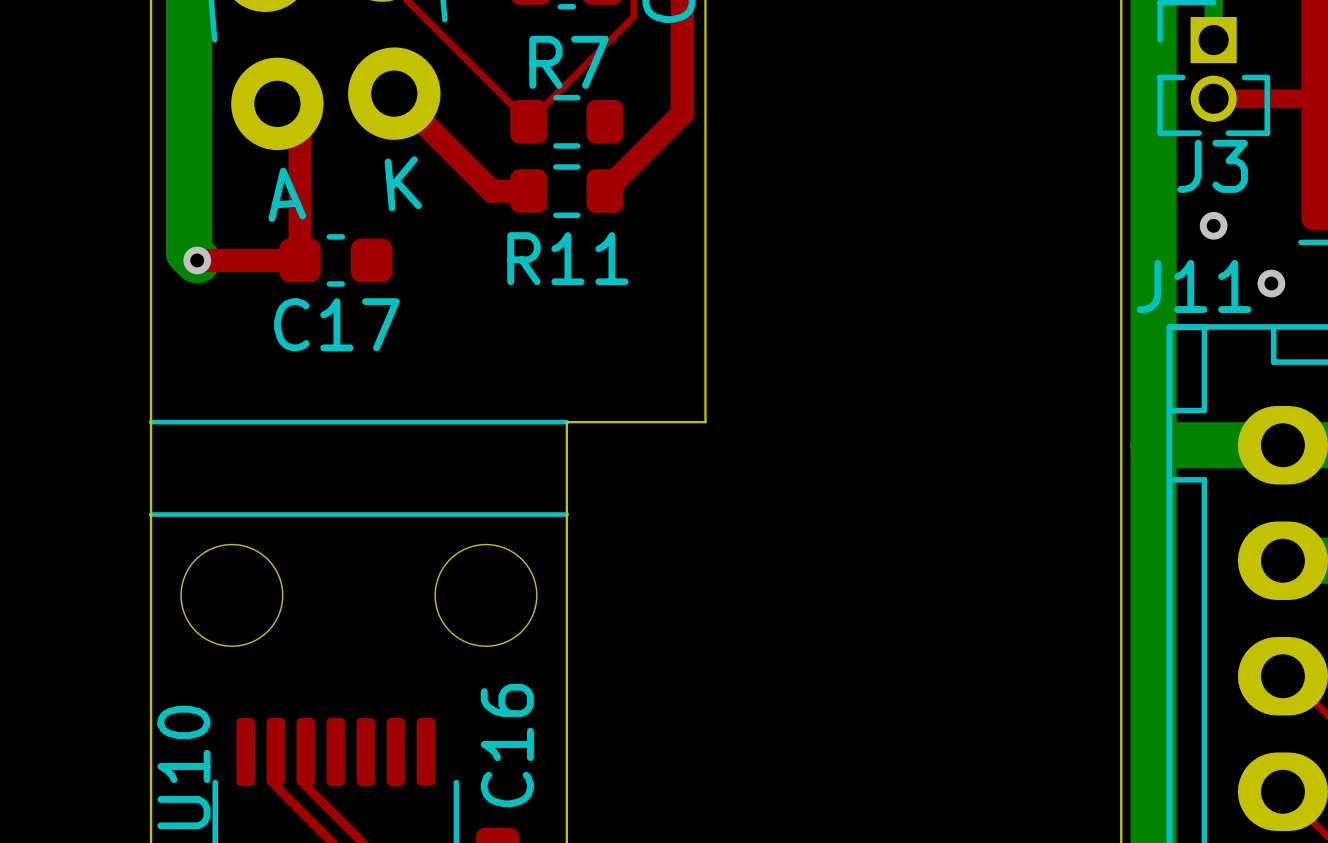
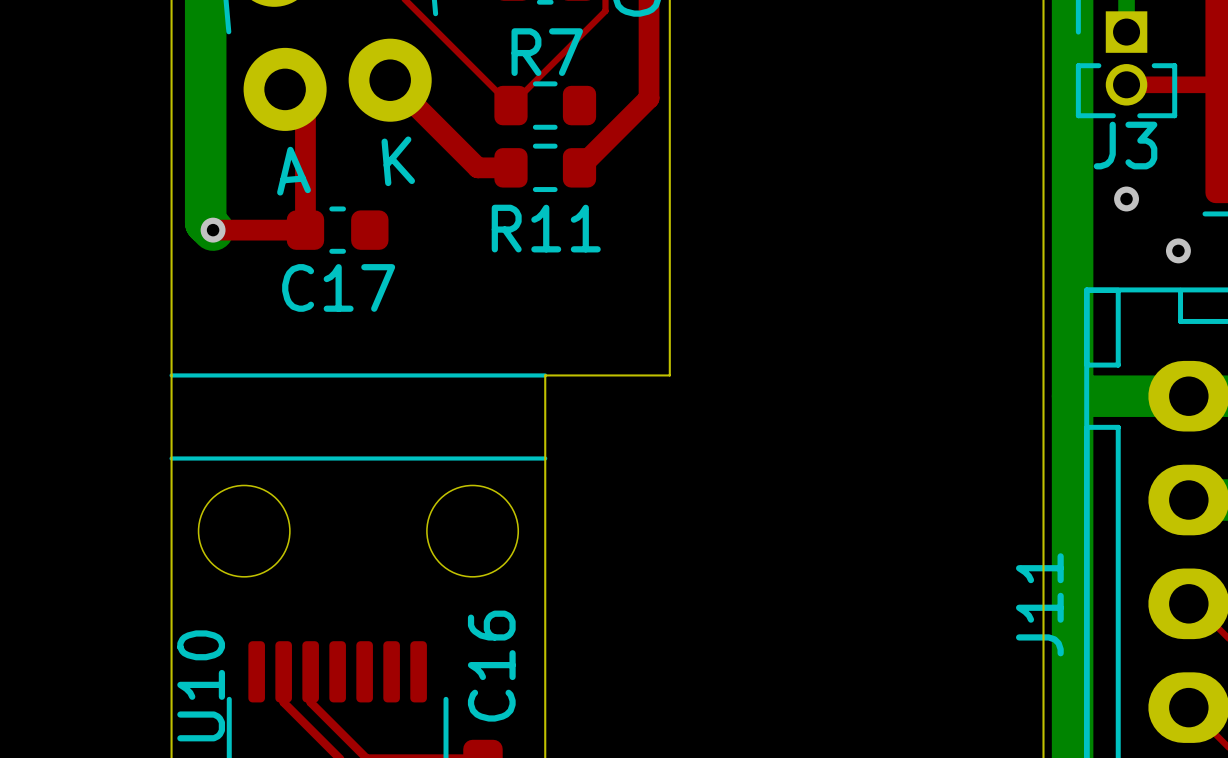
J11 name rotation: 0° (1194, 286) -> 90° counterclockwise (1039, 604)
J11 name position: J11 (1194, 286) -> J11 (1039, 604)

